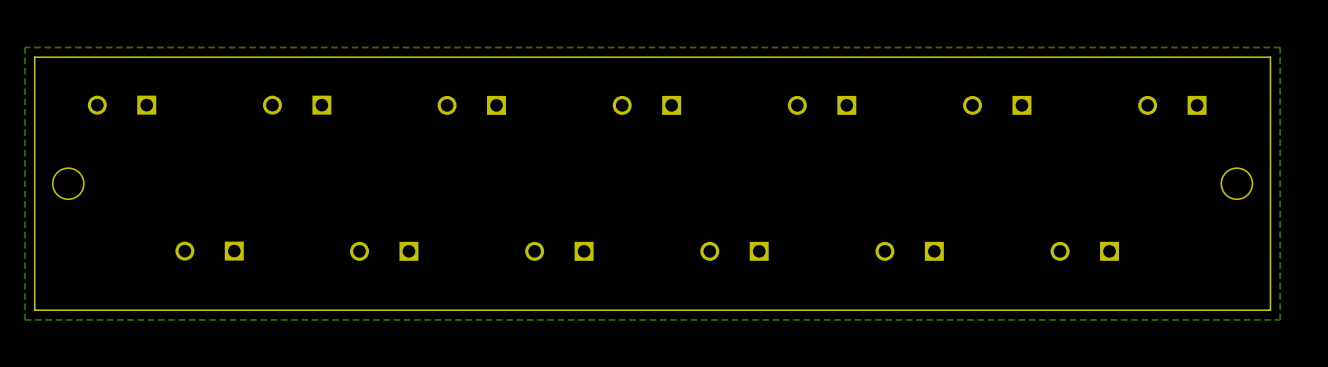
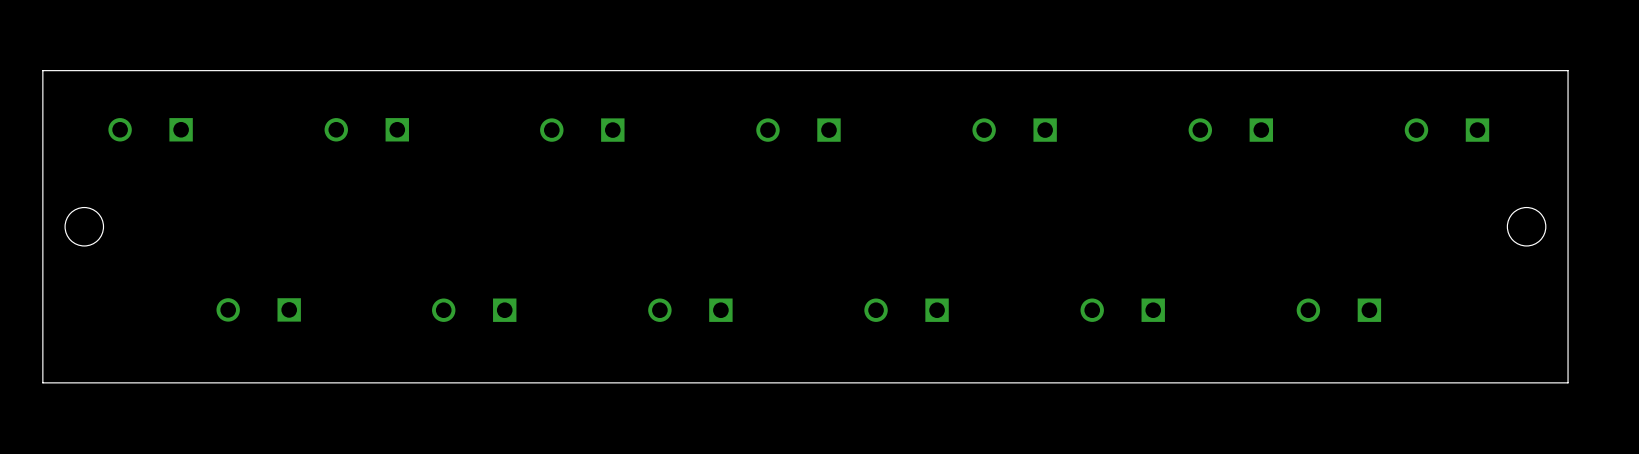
bottom zone outline: (1280, 47) (24, 47) (24, 319) (1280, 319) (1280, 47) -> none

